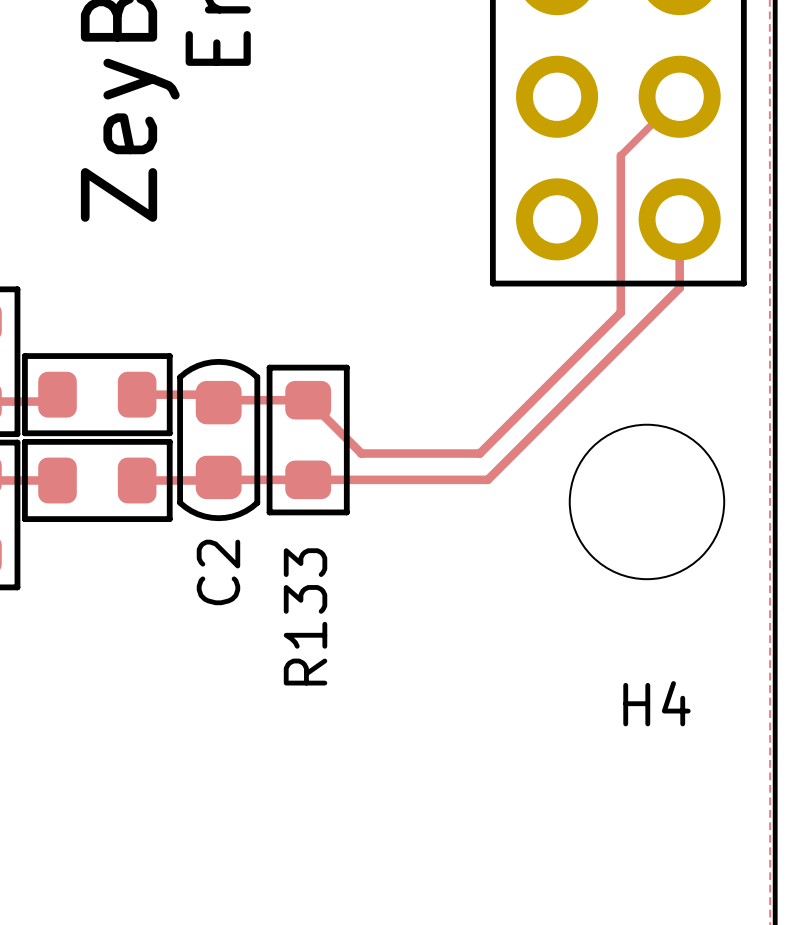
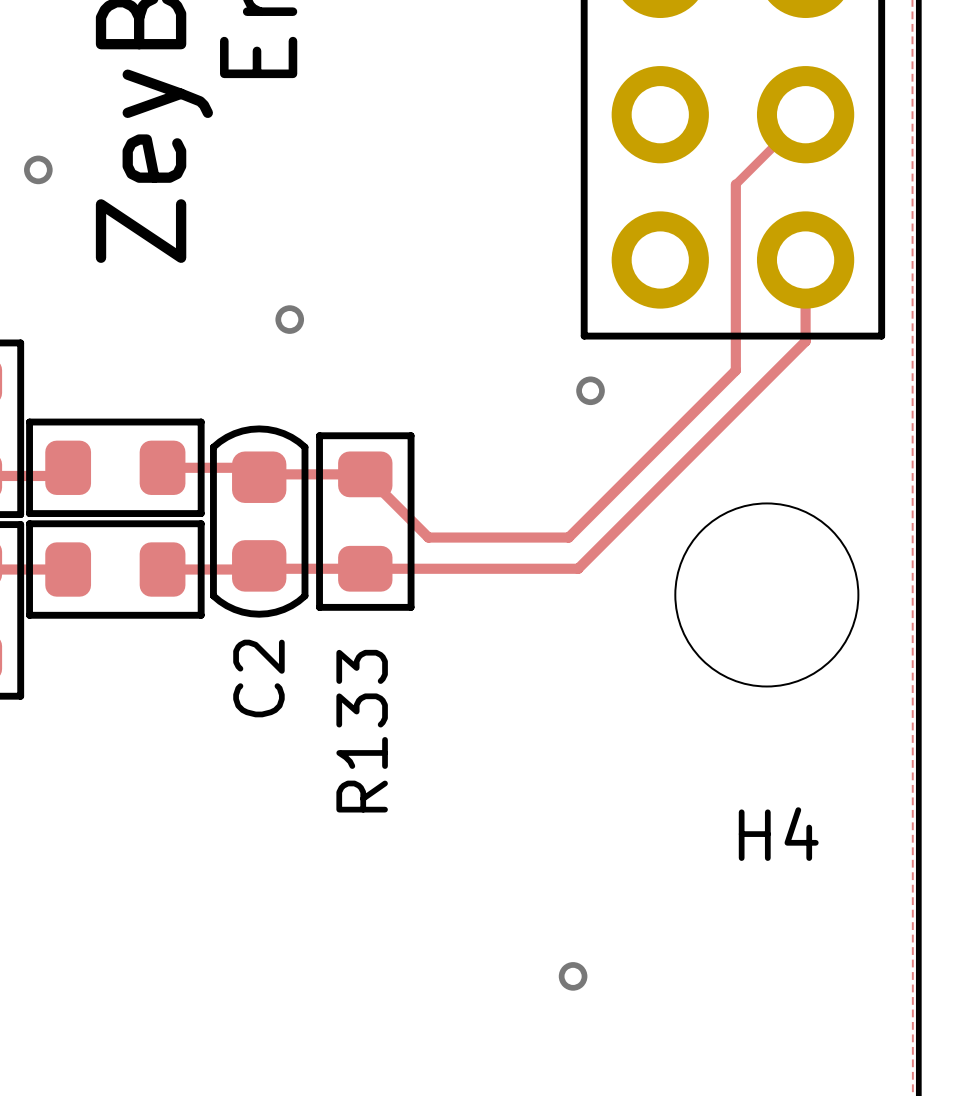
via: none -> (38, 169)
via: none -> (289, 319)
via: none -> (590, 390)
via: none -> (573, 976)

